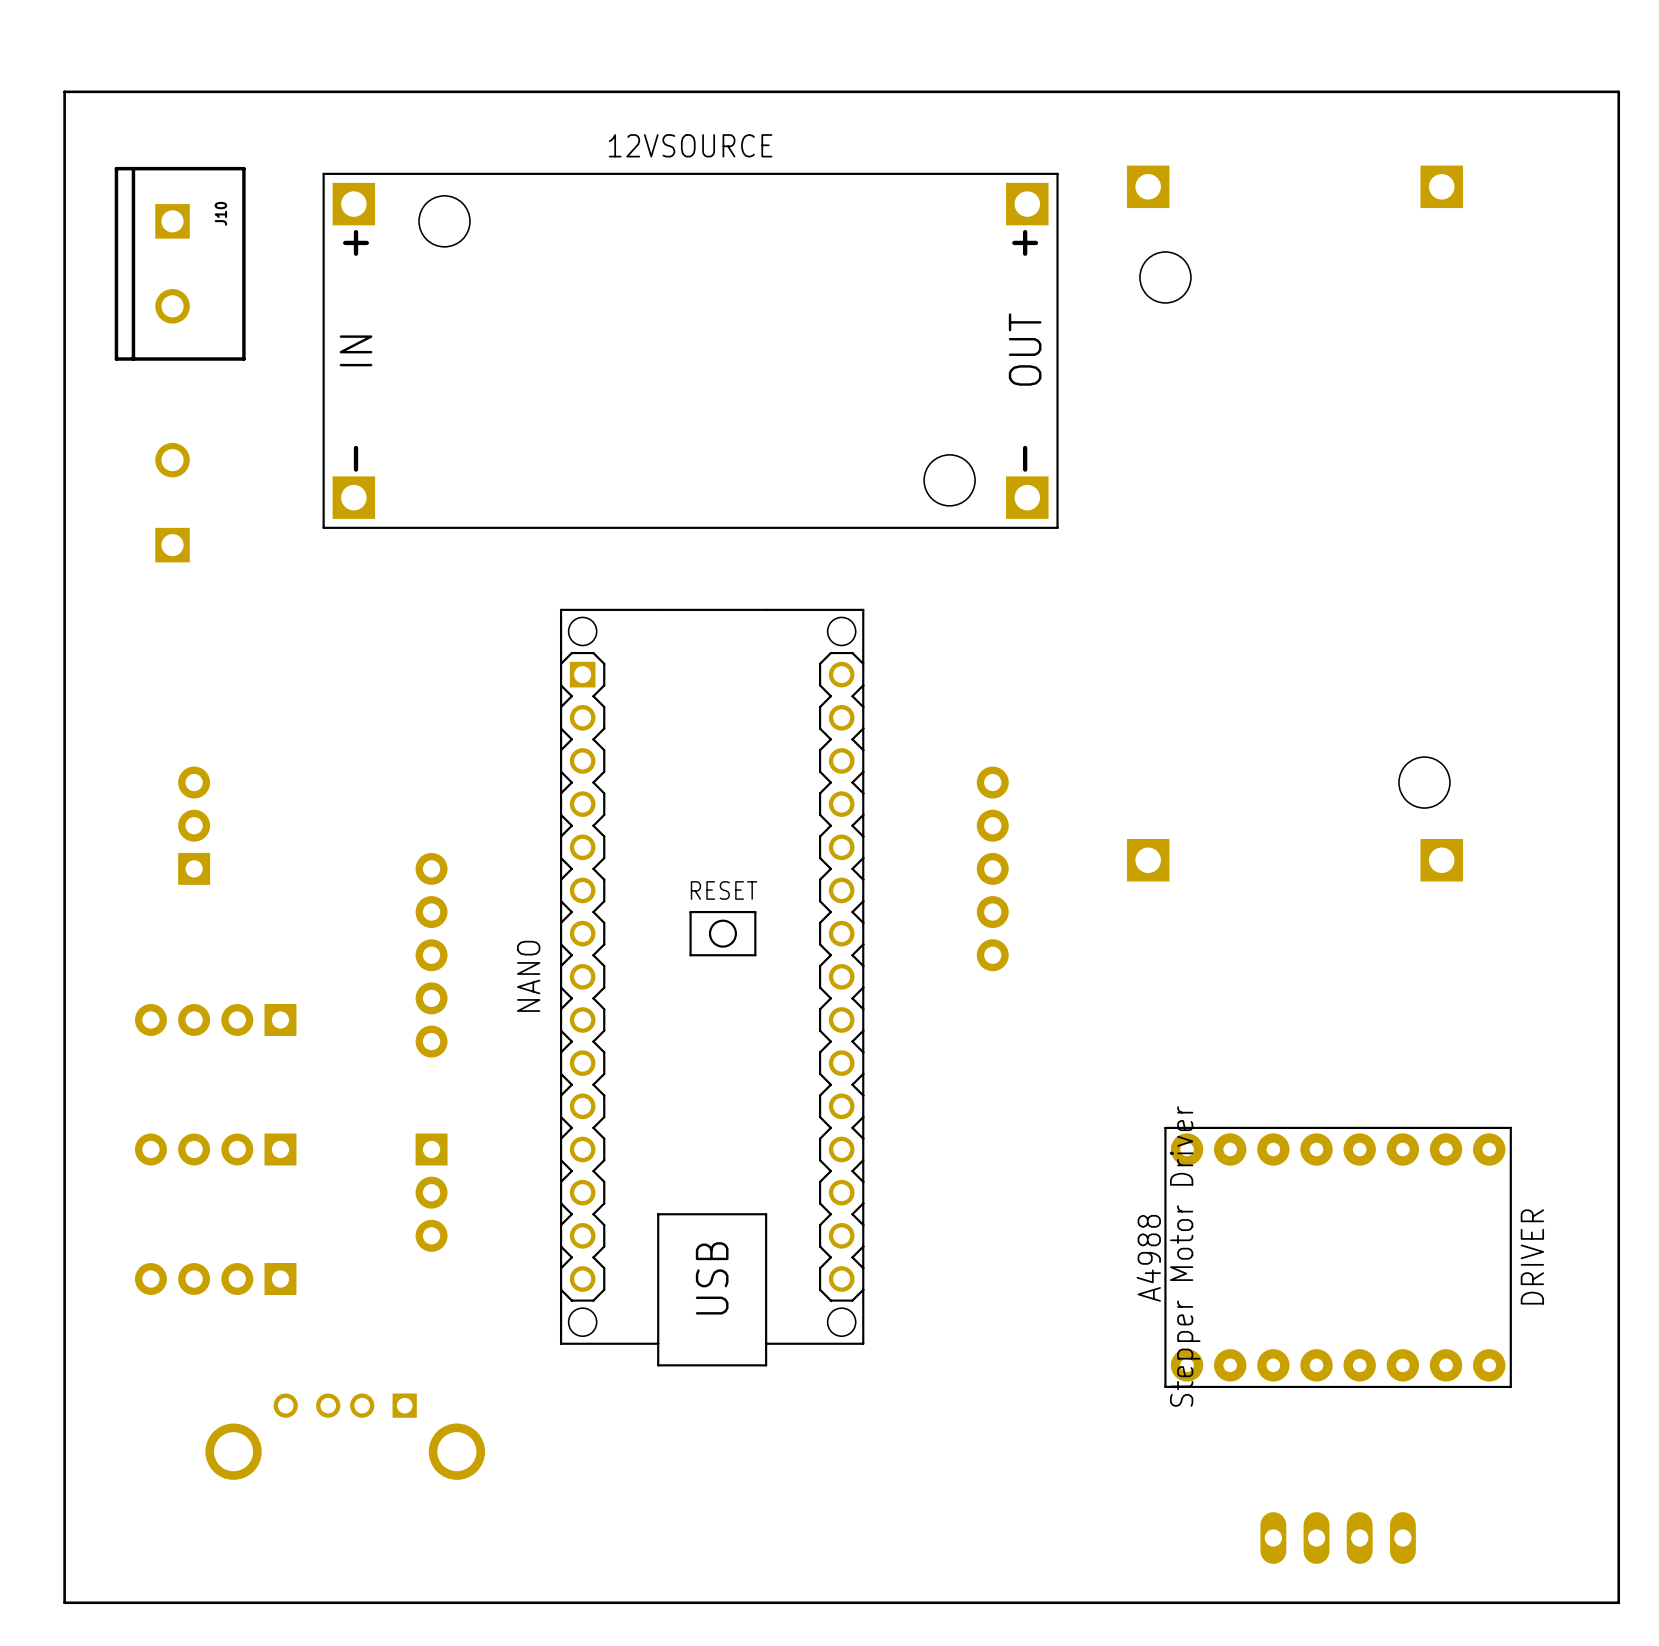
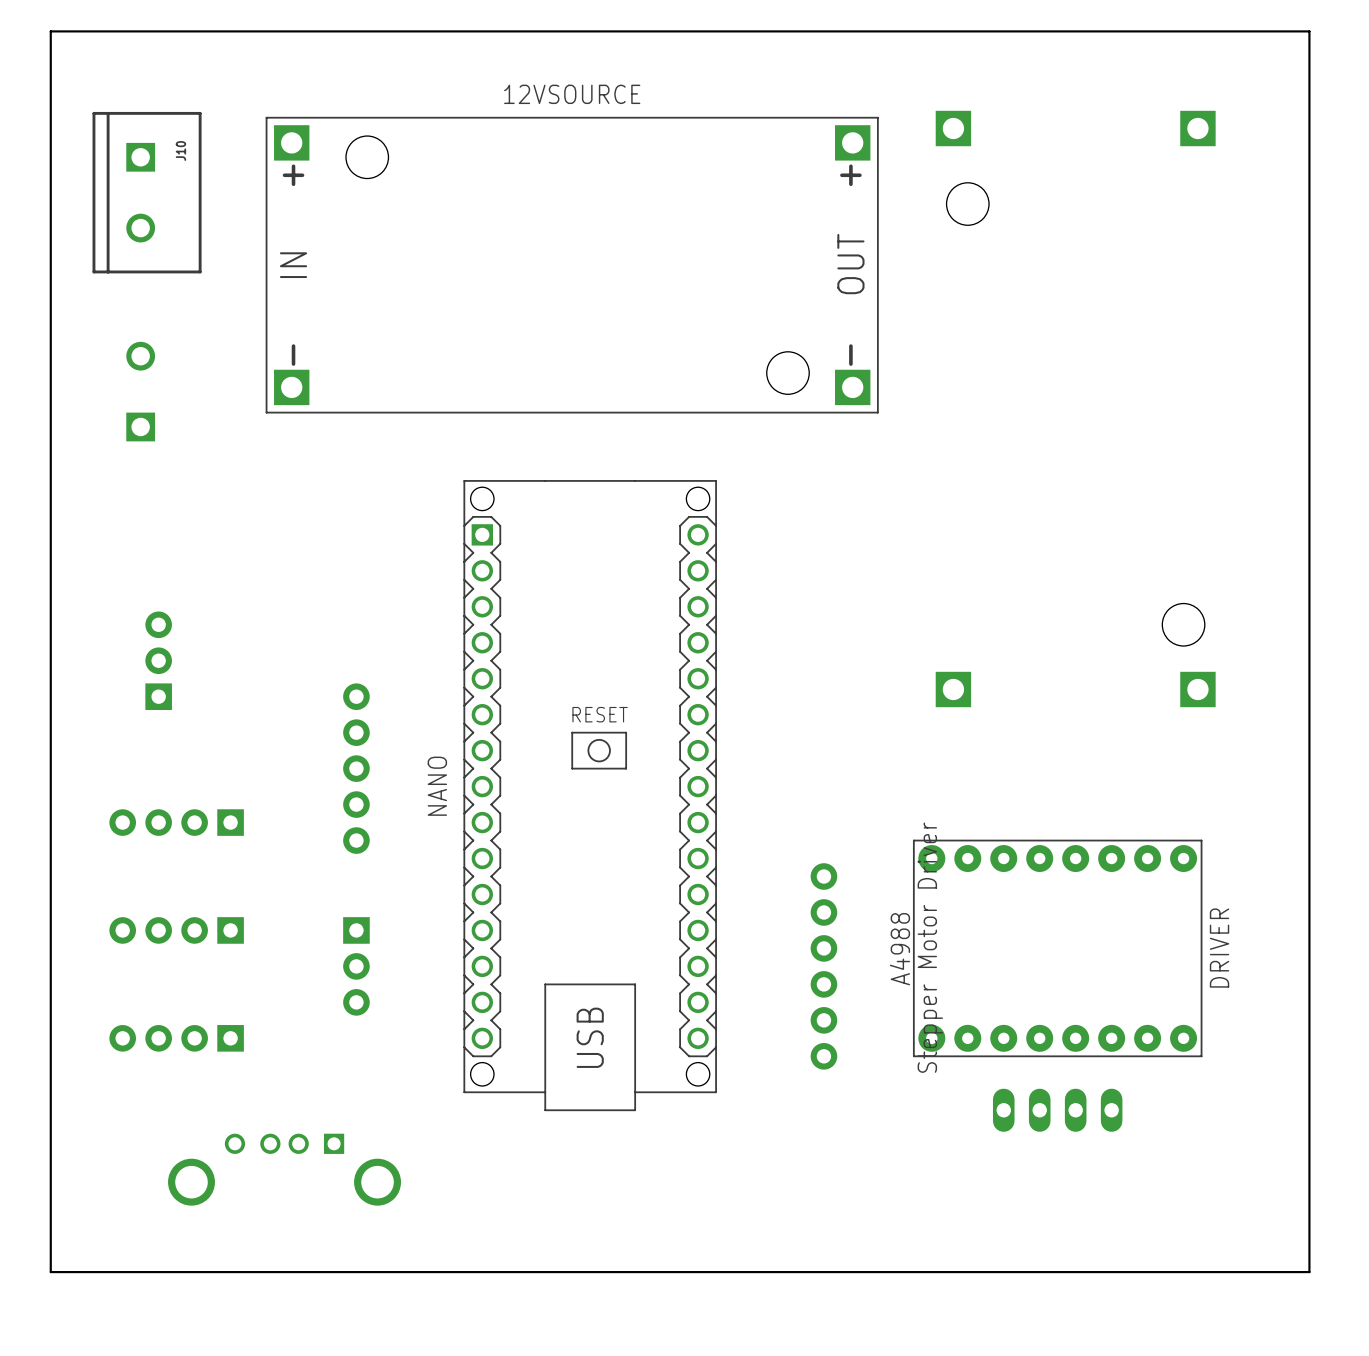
board edge: (64, 91) (1618, 91) (1618, 1602) (64, 1602) (64, 1559) -> (50, 49) (50, 31) (1309, 31) (1309, 1272) (50, 1272)
part: (992, 868) -> none
part: none -> (823, 966)
DRIVER position: (1338, 1257) -> (1057, 948)
part position: (1338, 1538) -> (1057, 1110)

